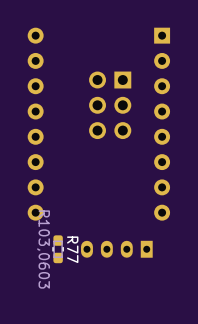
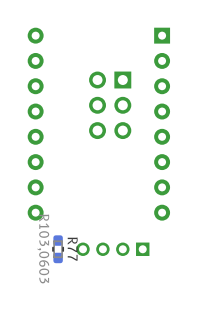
part footprint: [81, 240, 153, 258] -> [76, 242, 150, 256]

